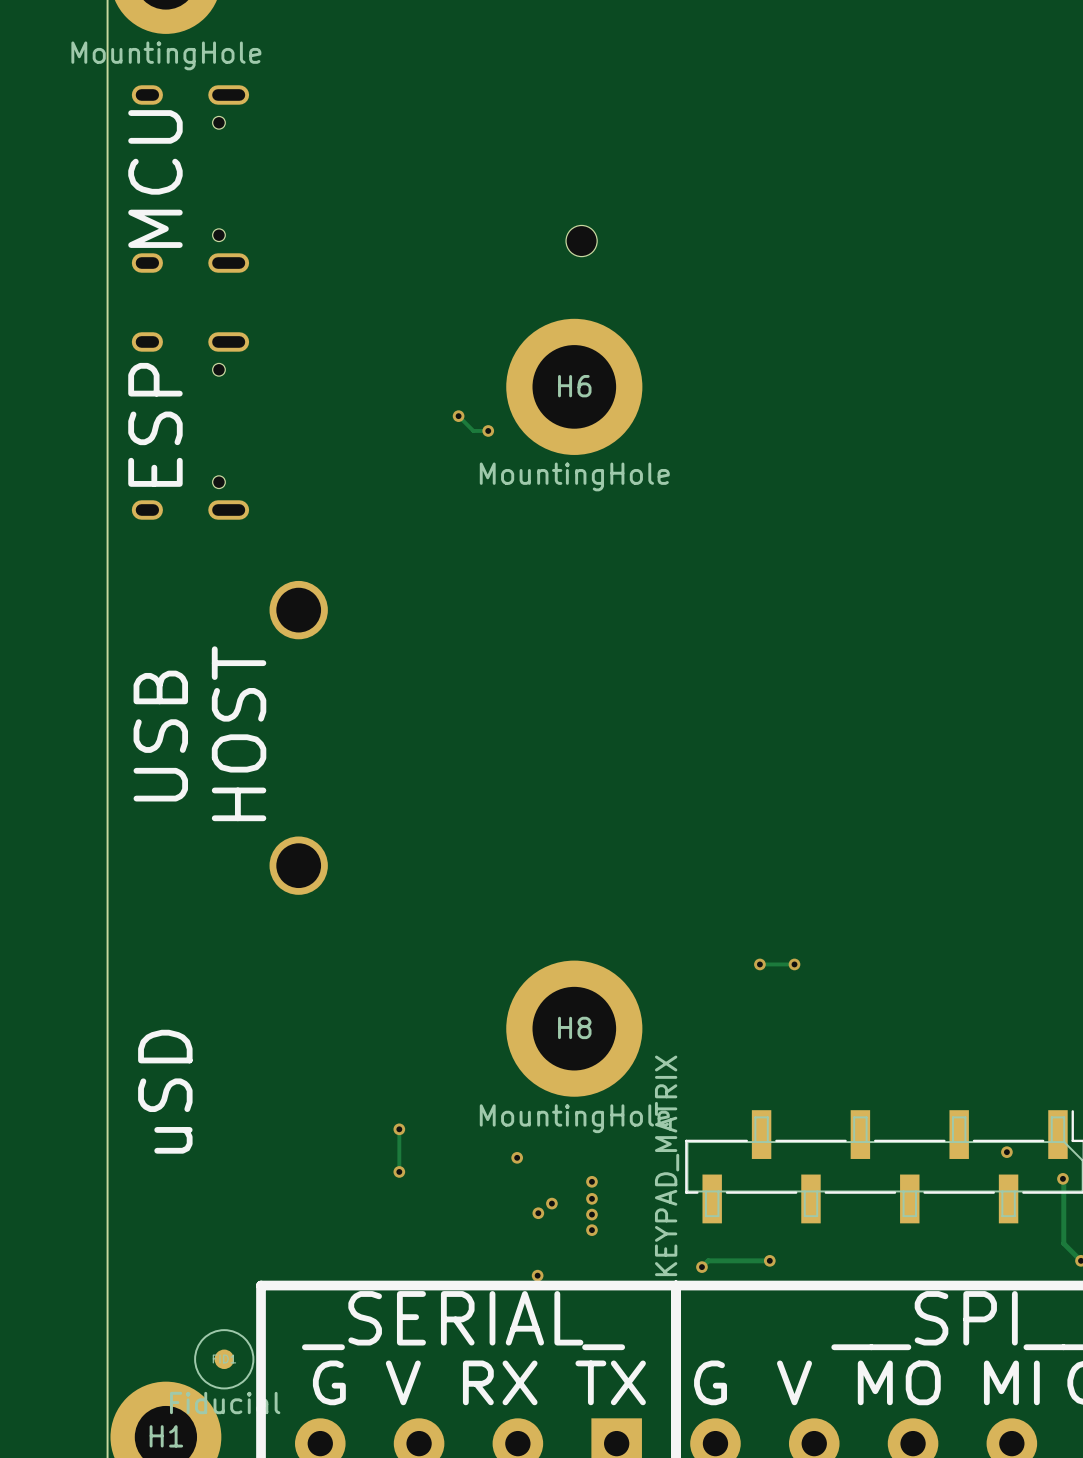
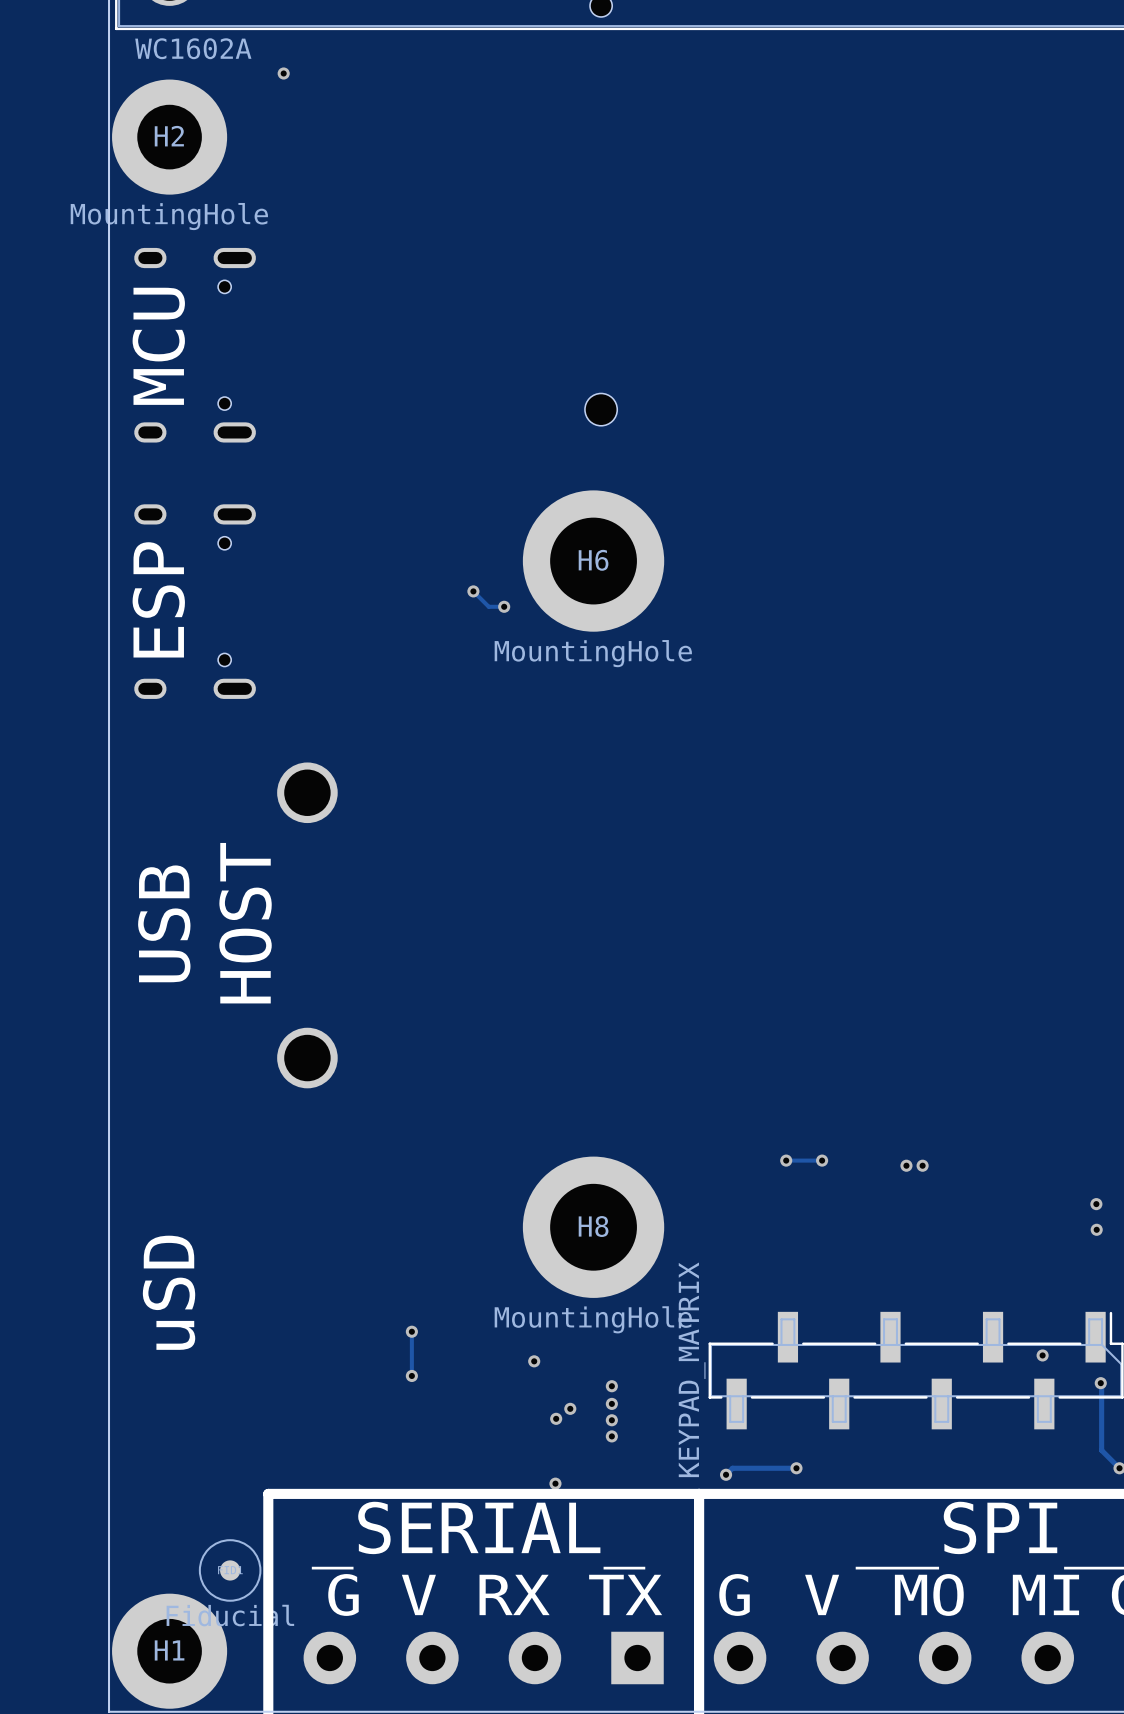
via: none -> (906, 1165)
via: none -> (922, 1165)
via: none -> (1096, 1204)
via: none -> (1096, 1229)

